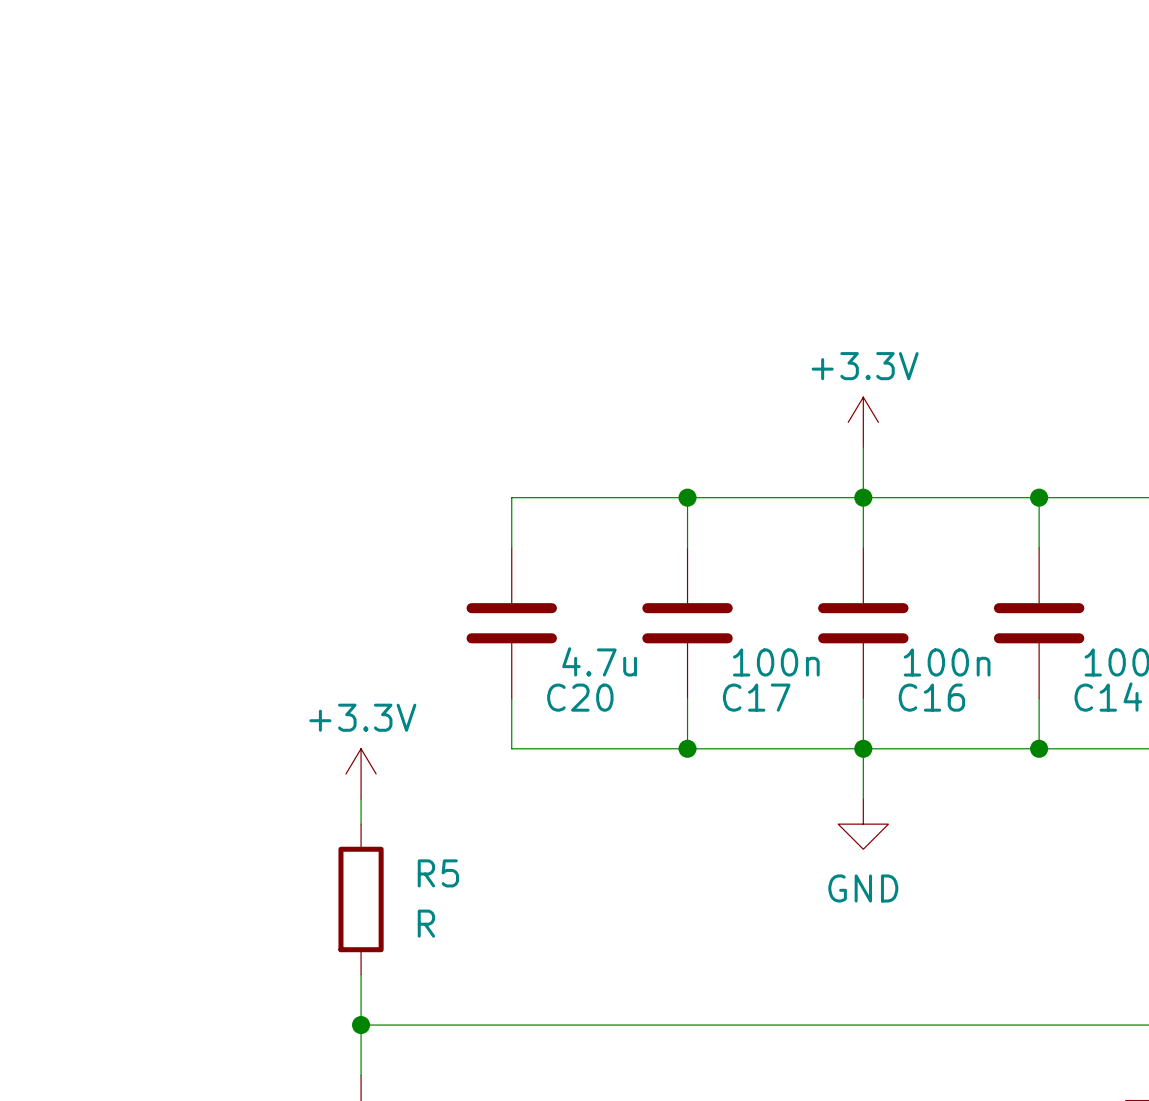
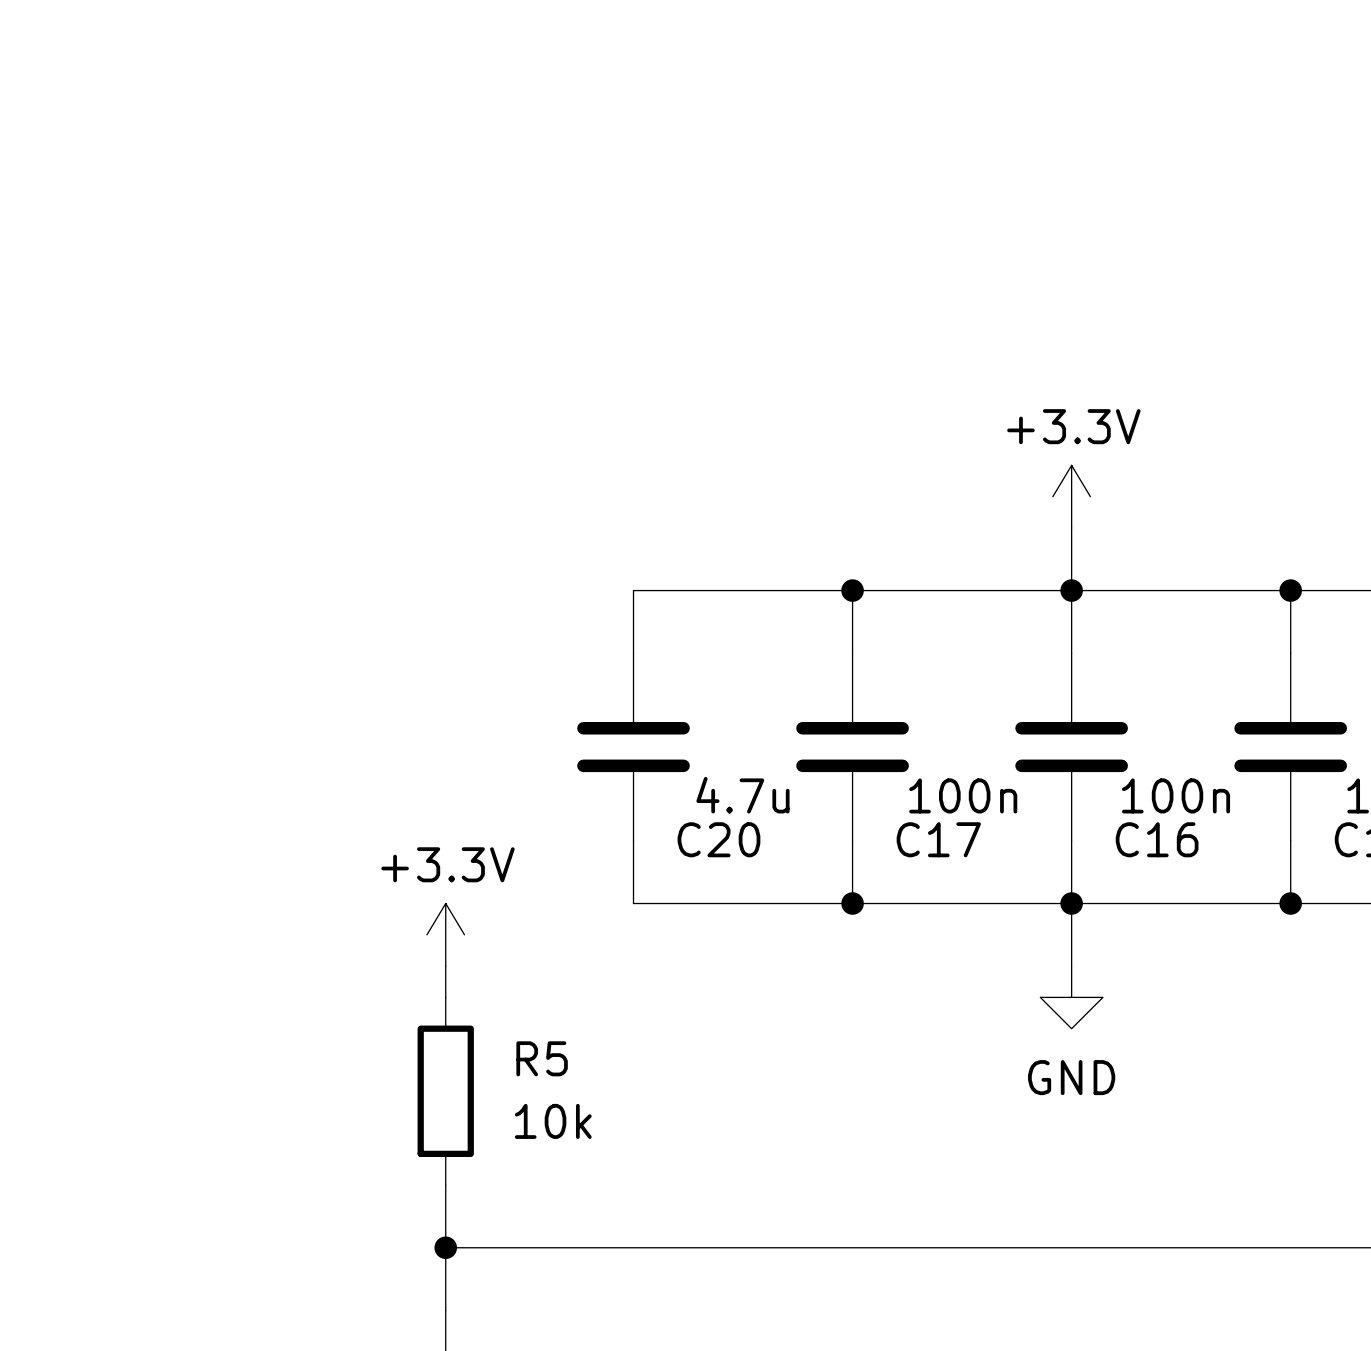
R5 value: R (426, 923) -> 10k (553, 1121)

